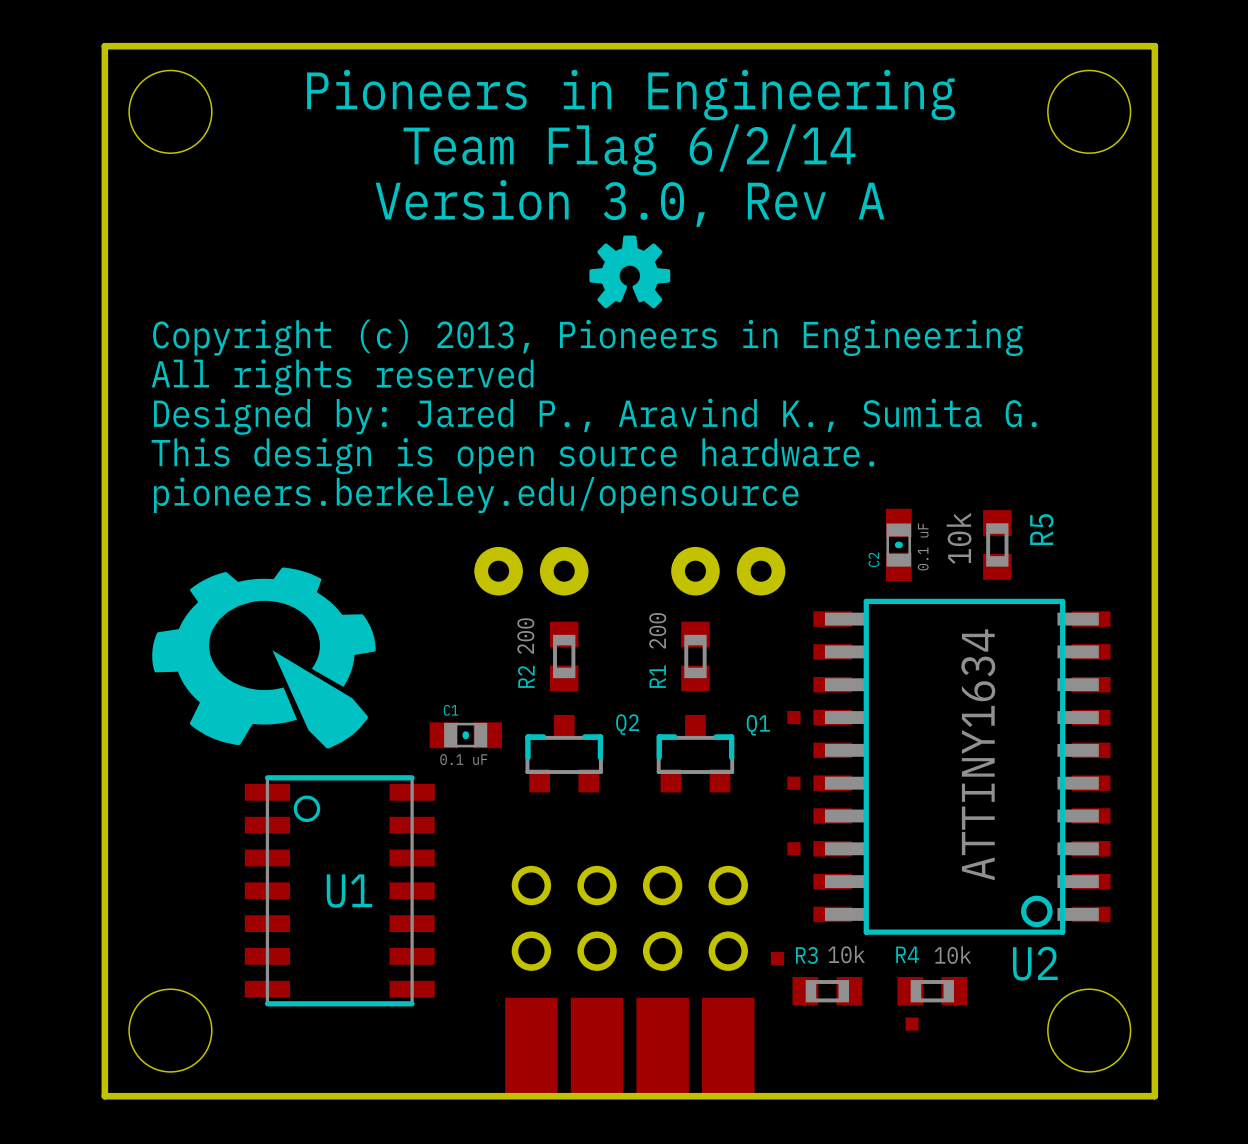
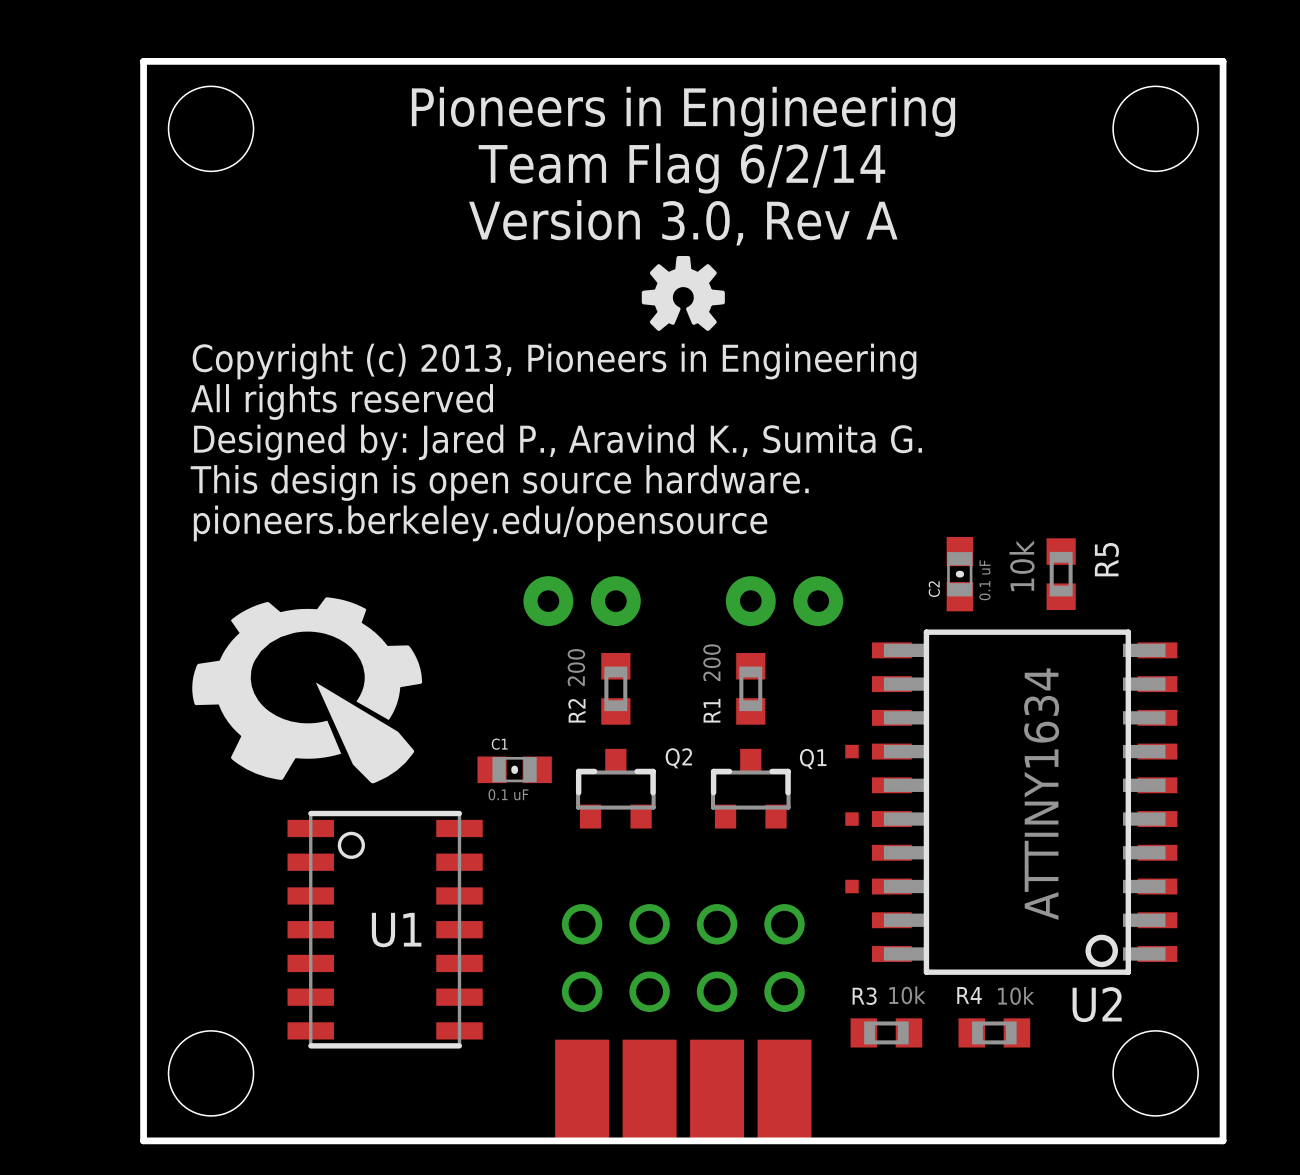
part: (777, 958) -> none
part: (912, 1024) -> none

